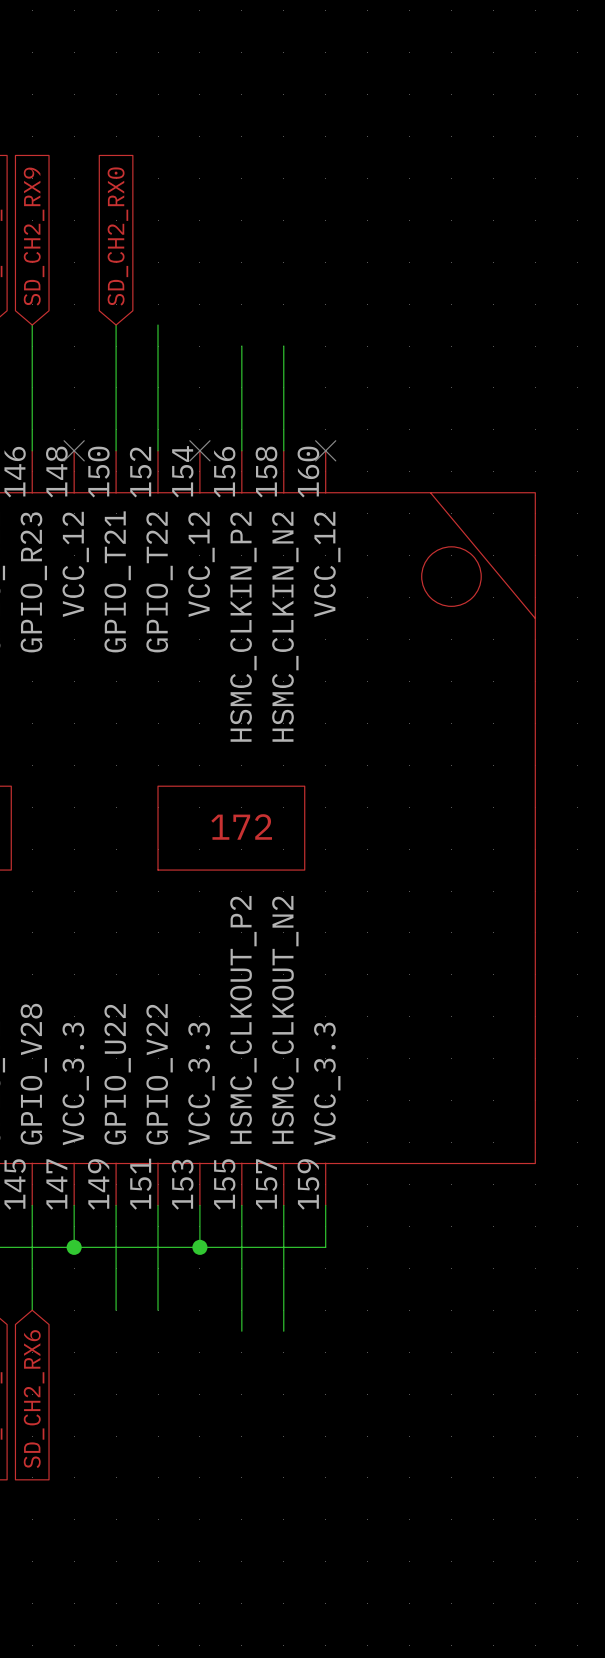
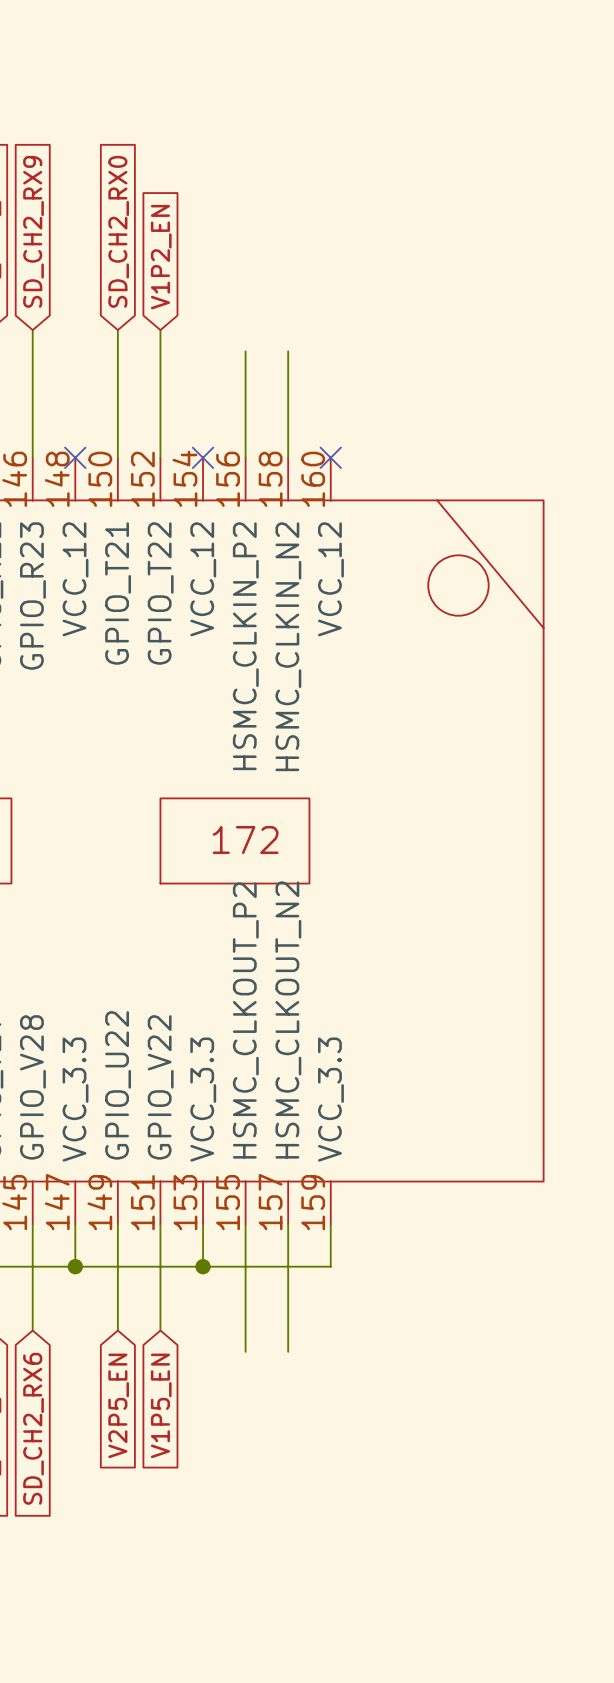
global label: none -> V1P2_EN (161, 257)
global label: none -> V2P5_EN (118, 1405)
global label: none -> V1P5_EN (161, 1405)

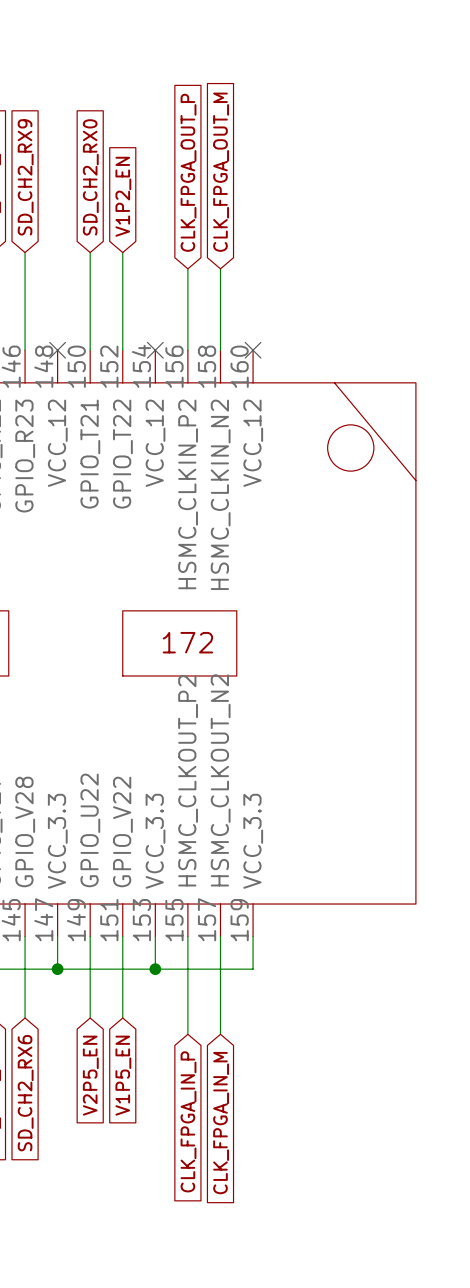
global label: none -> CLK_FPGA_OUT_P (188, 172)
global label: none -> CLK_FPGA_OUT_M (221, 172)
global label: none -> CLK_FPGA_IN_P (188, 1121)
global label: none -> CLK_FPGA_IN_M (221, 1123)

